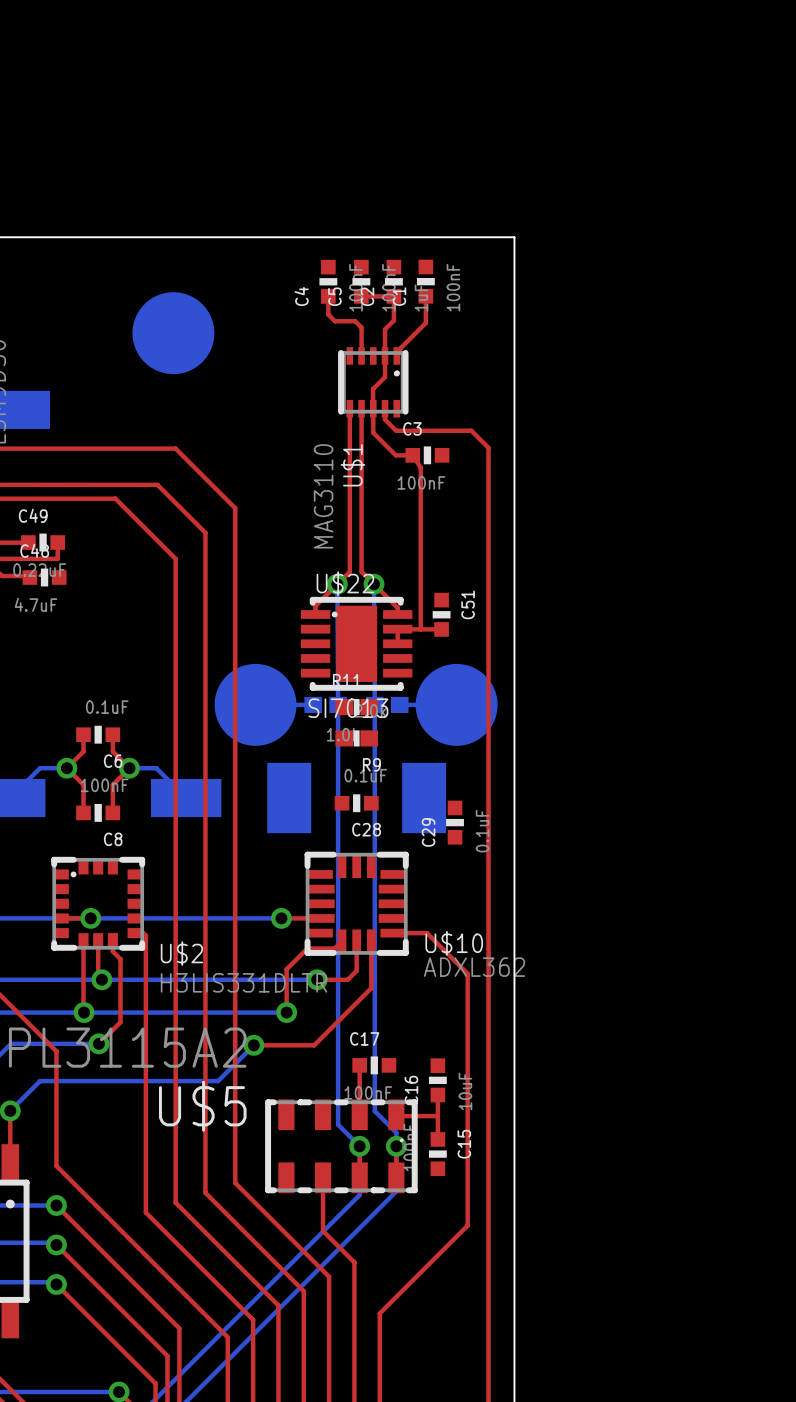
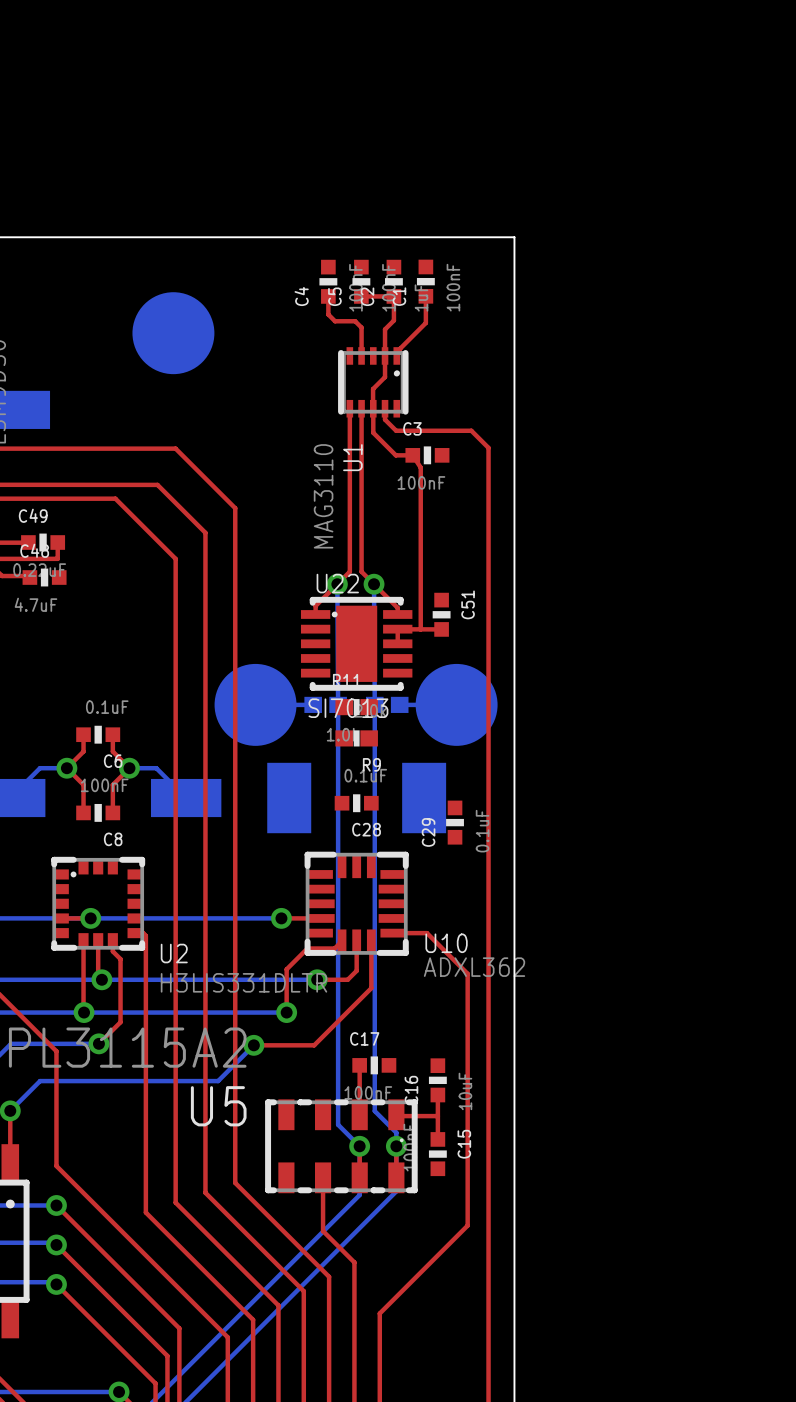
U$1 name: U$1 (352, 465) -> U1 (352, 457)
U$22 name: U$22 (345, 583) -> U22 (337, 583)
U$10 name: U$10 (454, 943) -> U10 (446, 943)
U$2 name: U$2 (181, 953) -> U2 (174, 953)
U$5 name: U$5 (202, 1106) -> U5 (218, 1106)

